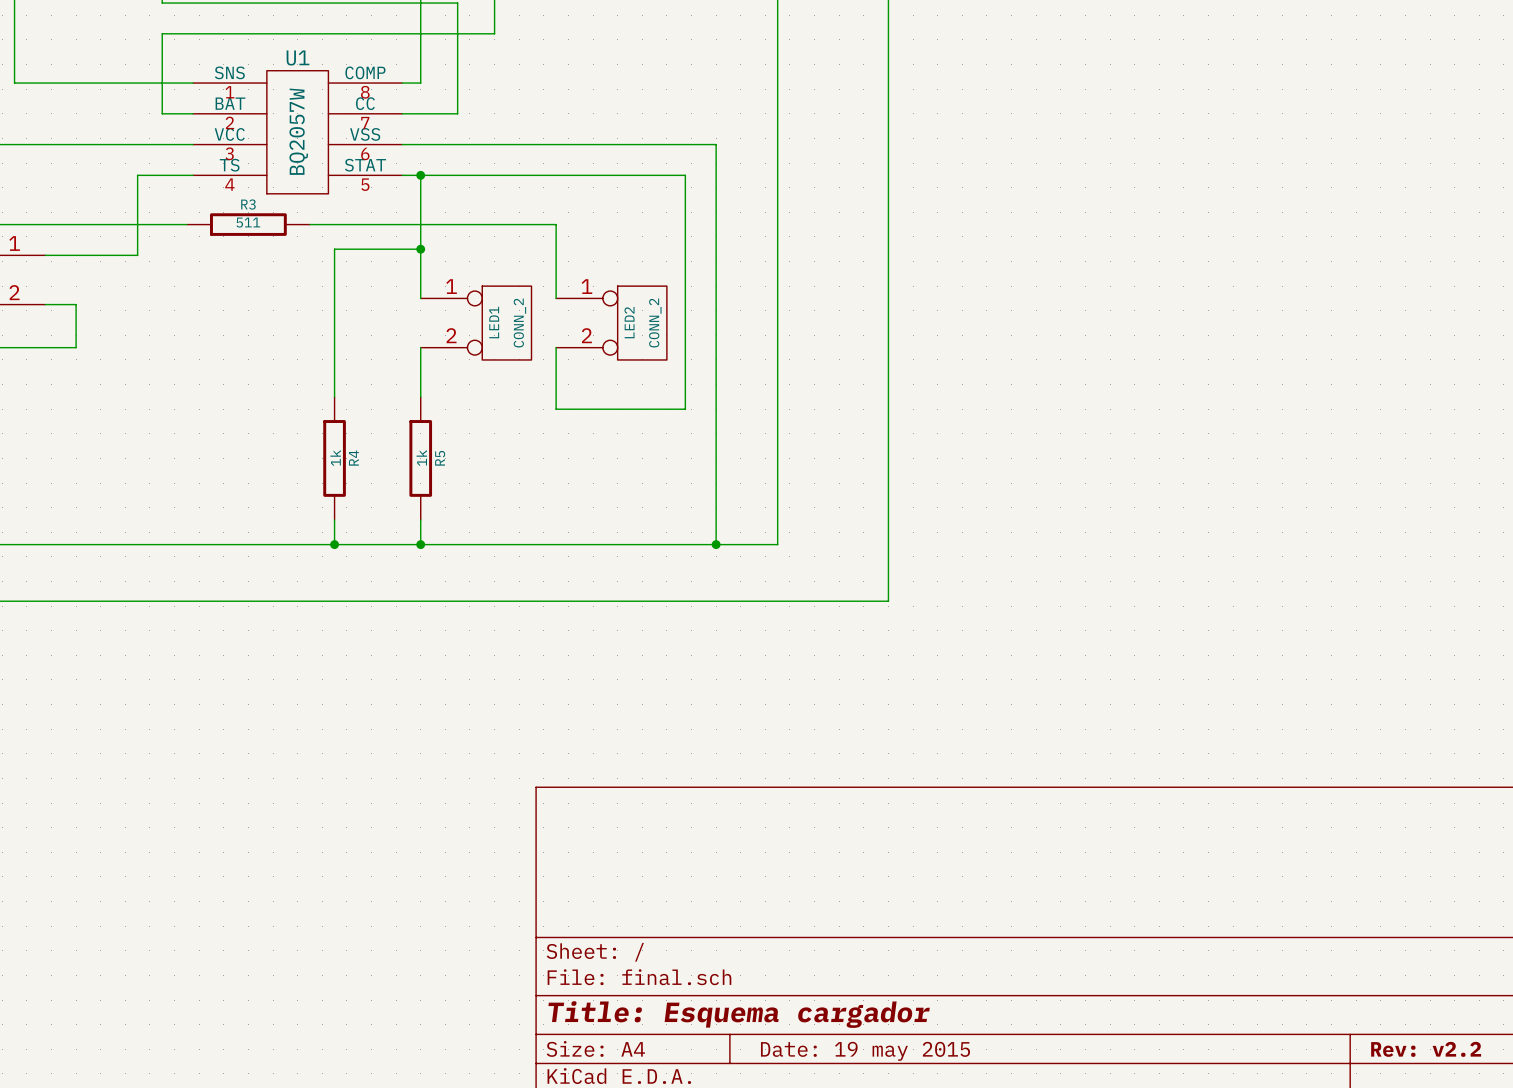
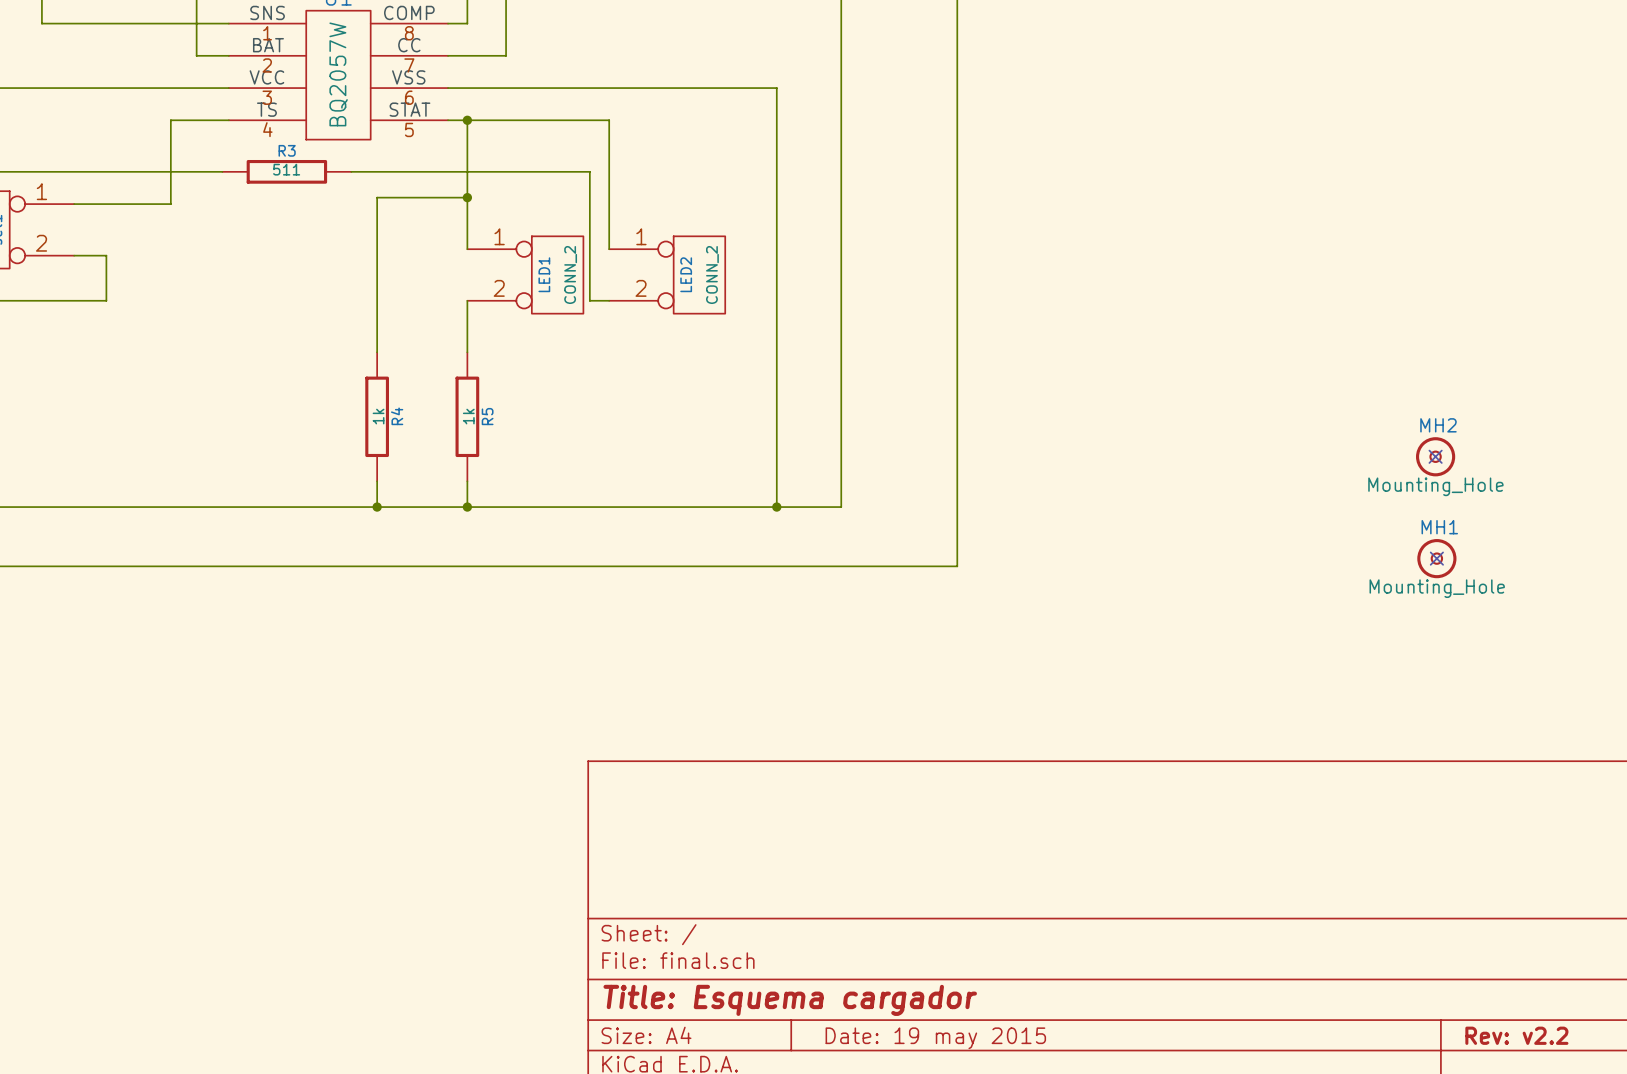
wire: (556, 175) (685, 175) (685, 409) (556, 409) (556, 347) -> (589, 171) (589, 300) (609, 300)
wire: (537, 224) (556, 224) -> (609, 120) (609, 171)
MH2: none -> Mounting_Hole (1435, 456)
no-connect mark: none -> (1435, 456)
MH1: none -> Mounting_Hole (1436, 558)
no-connect mark: none -> (1436, 558)

